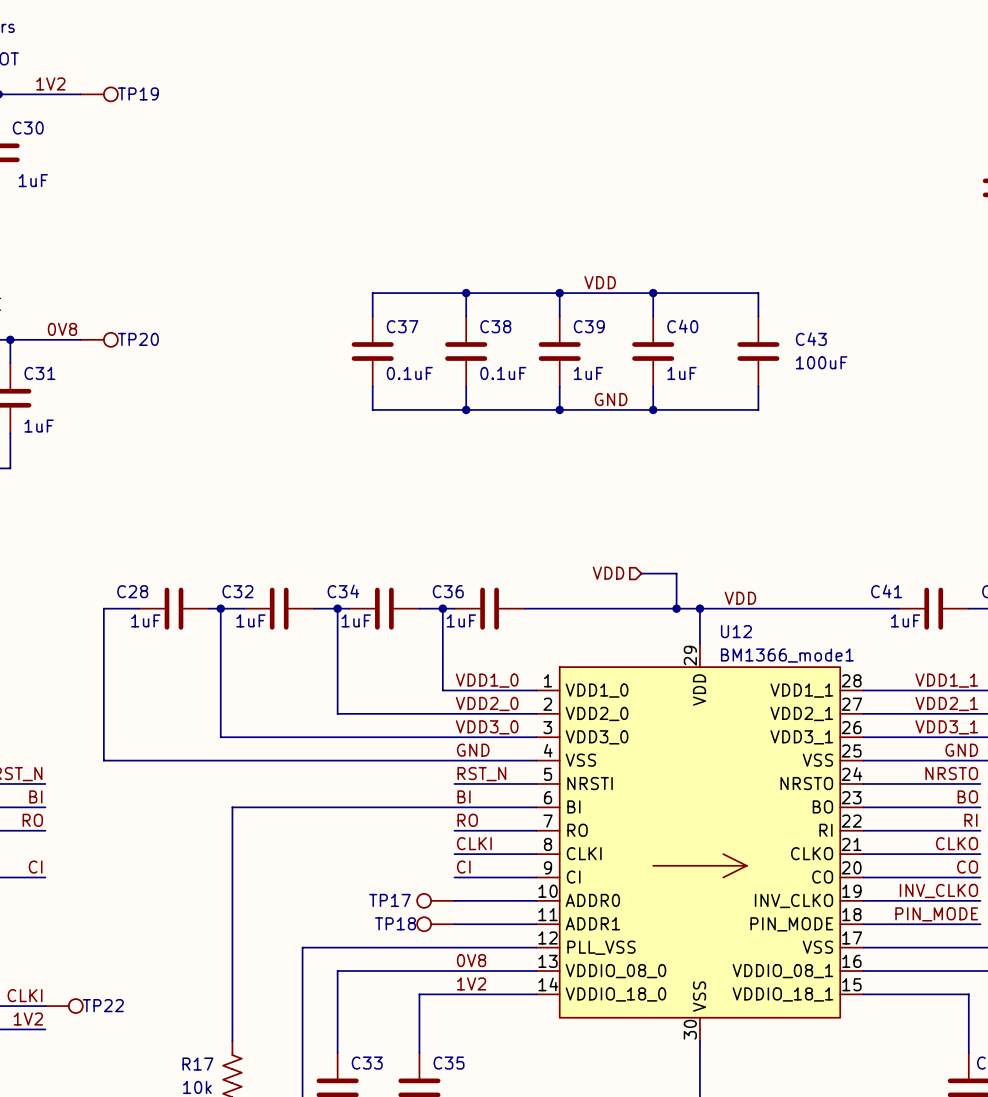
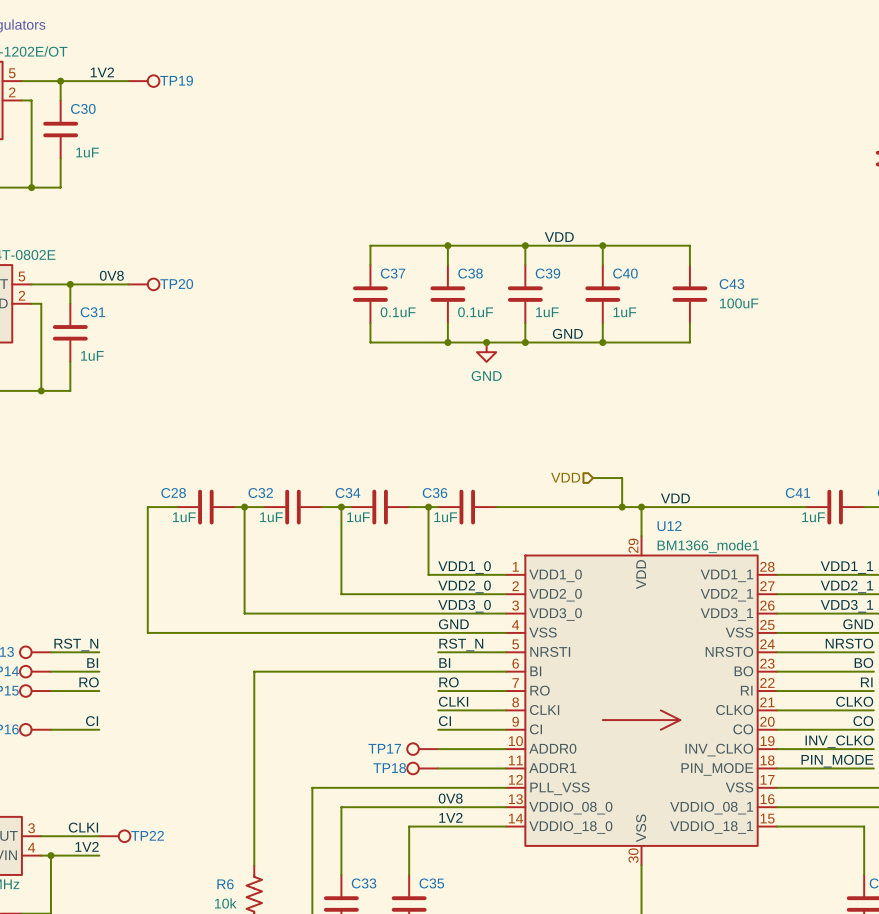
junction: none -> (486, 342)
power symbol: none -> GND (486, 352)
R17 name: R17 (197, 1064) -> R6 (225, 884)

